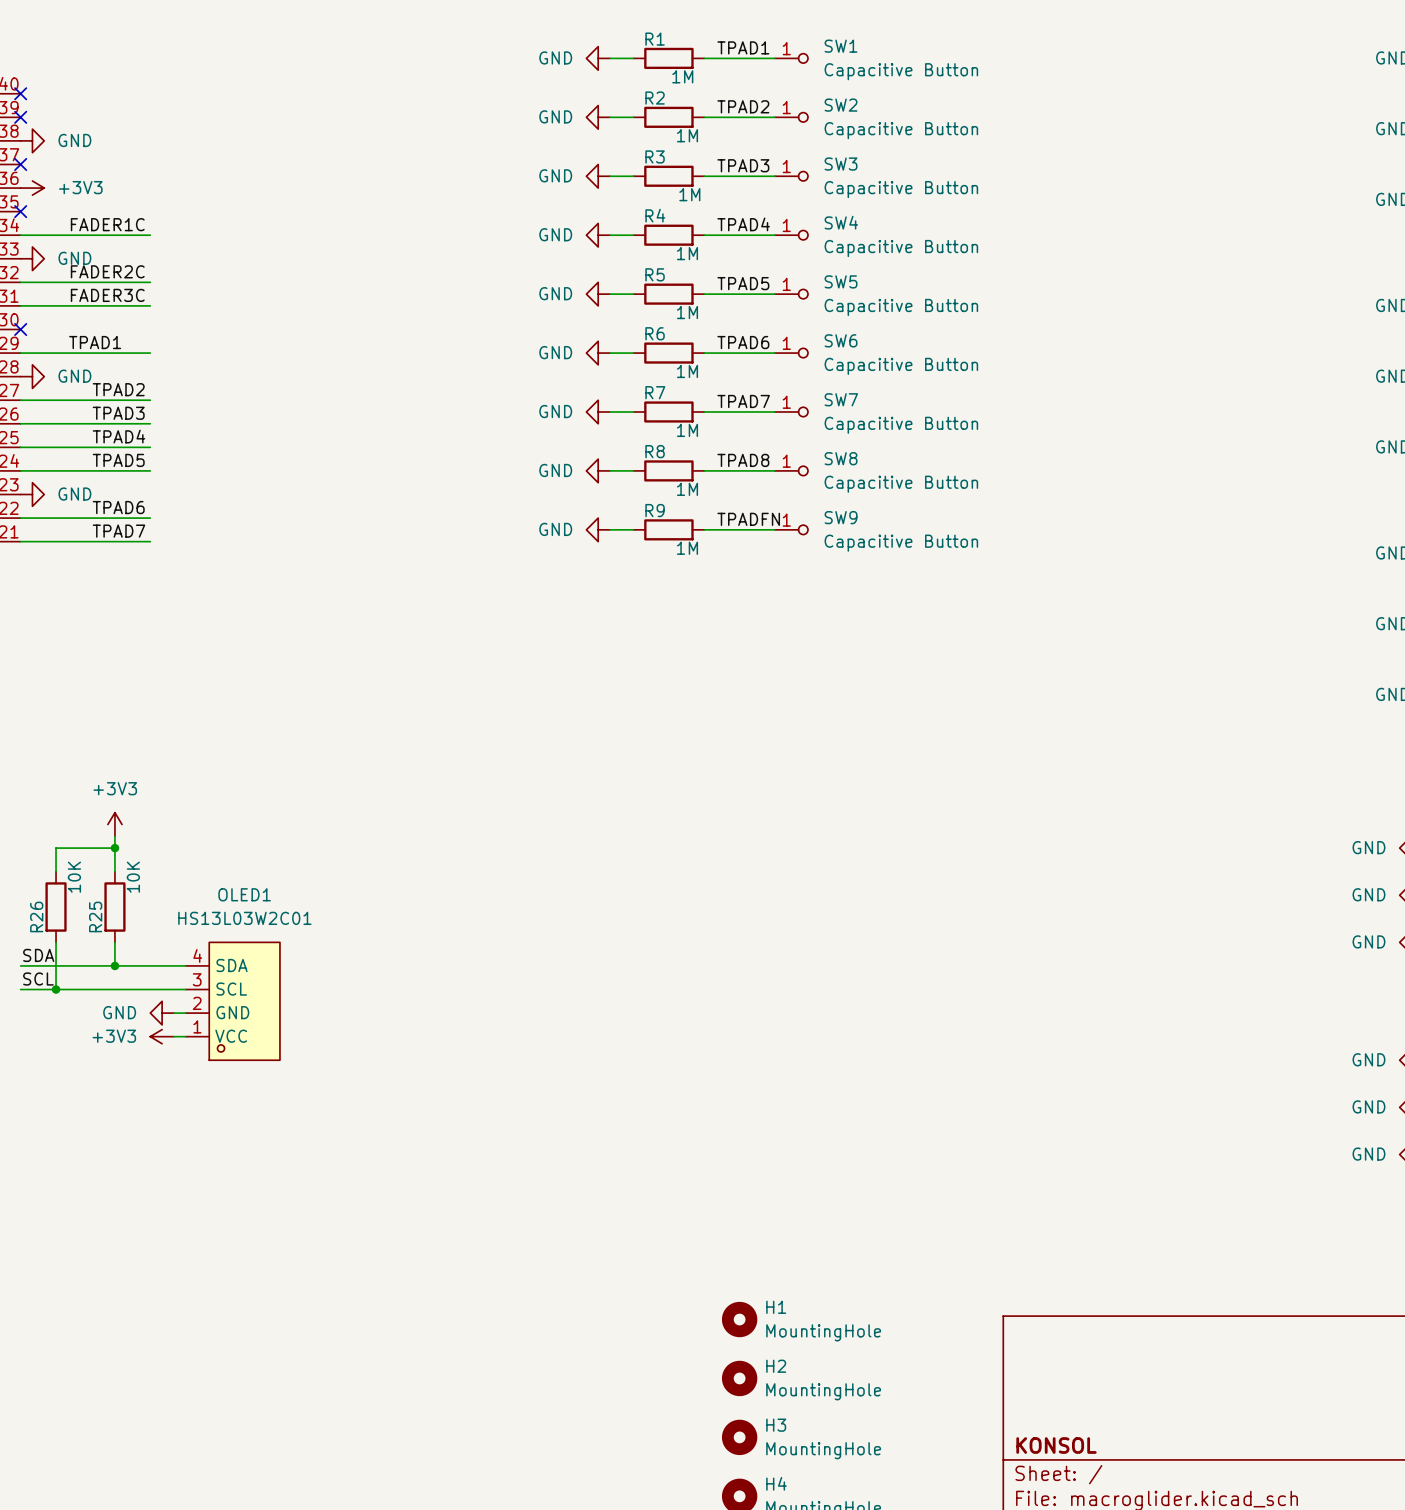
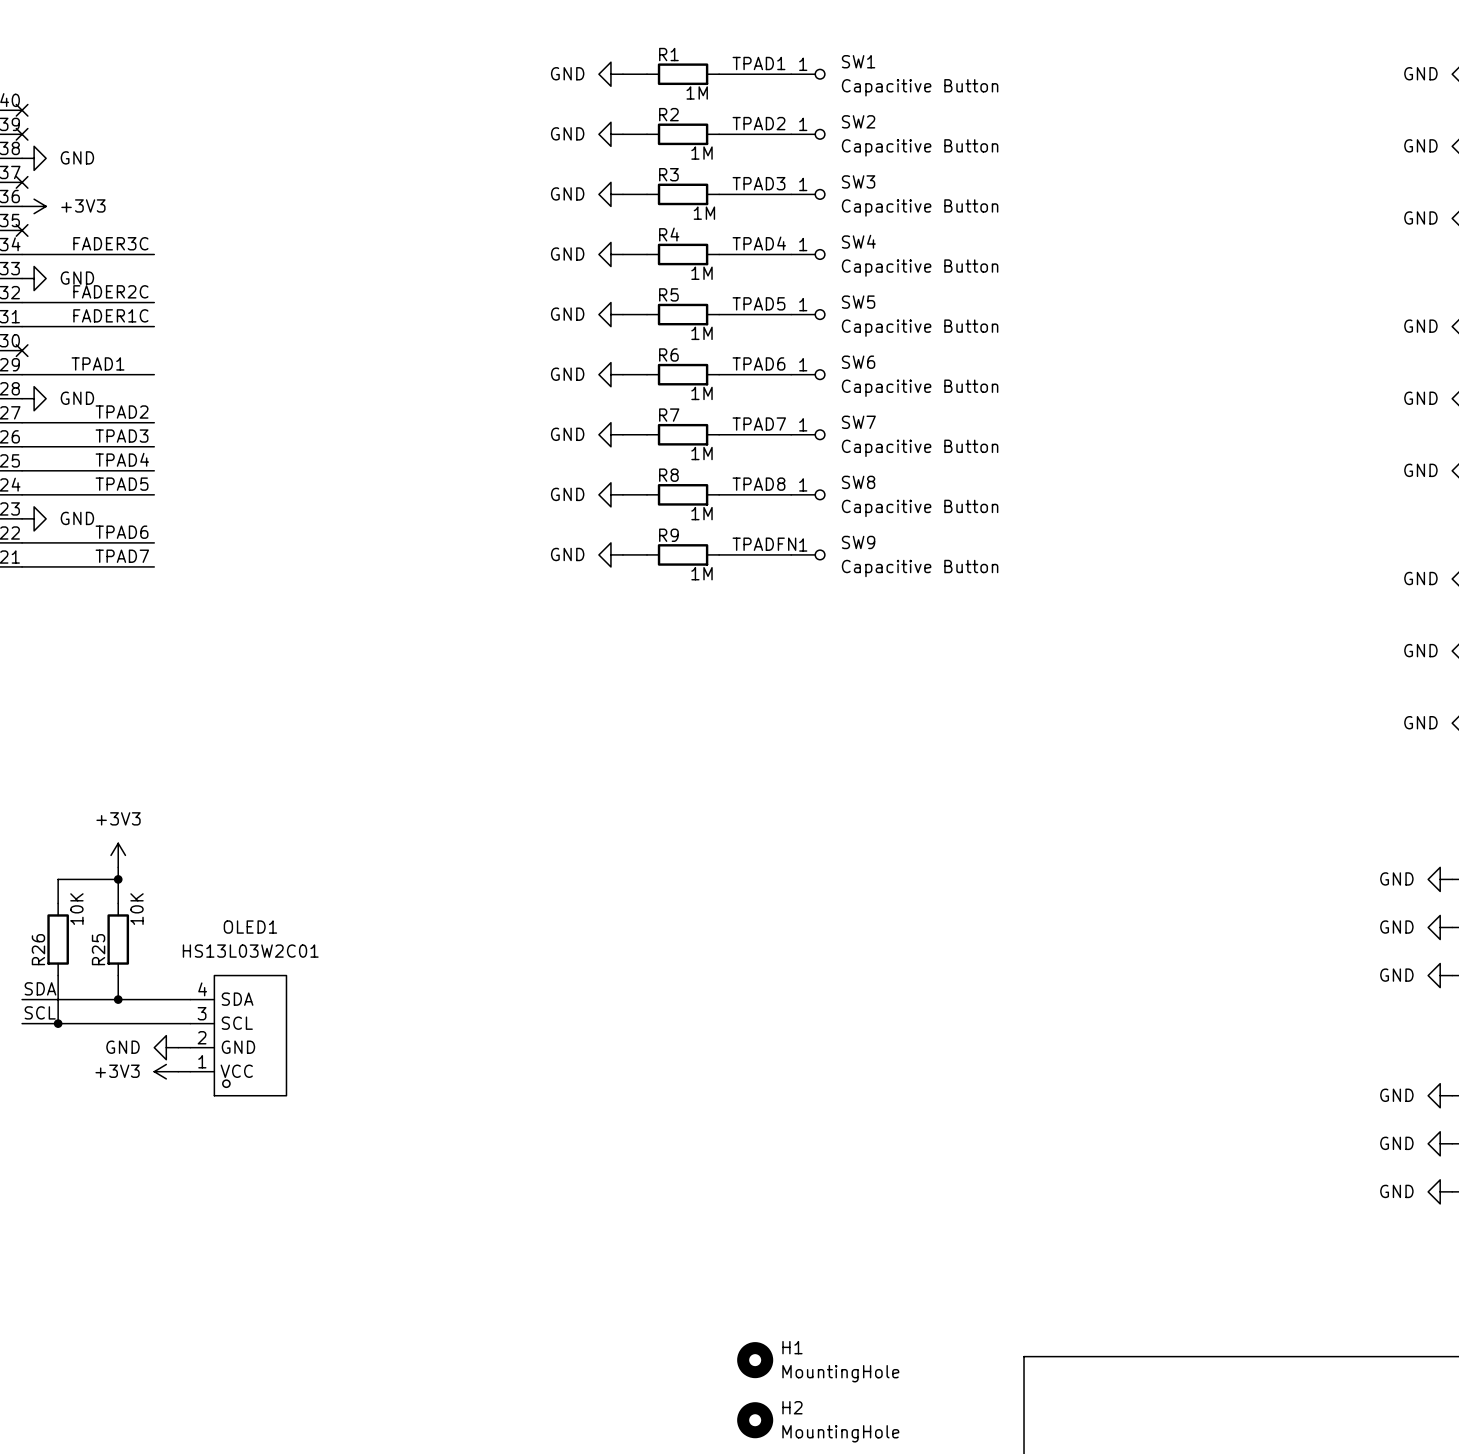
label: FADER1C (107, 224) -> FADER3C (110, 243)
label: FADER3C (107, 295) -> FADER1C (110, 315)

